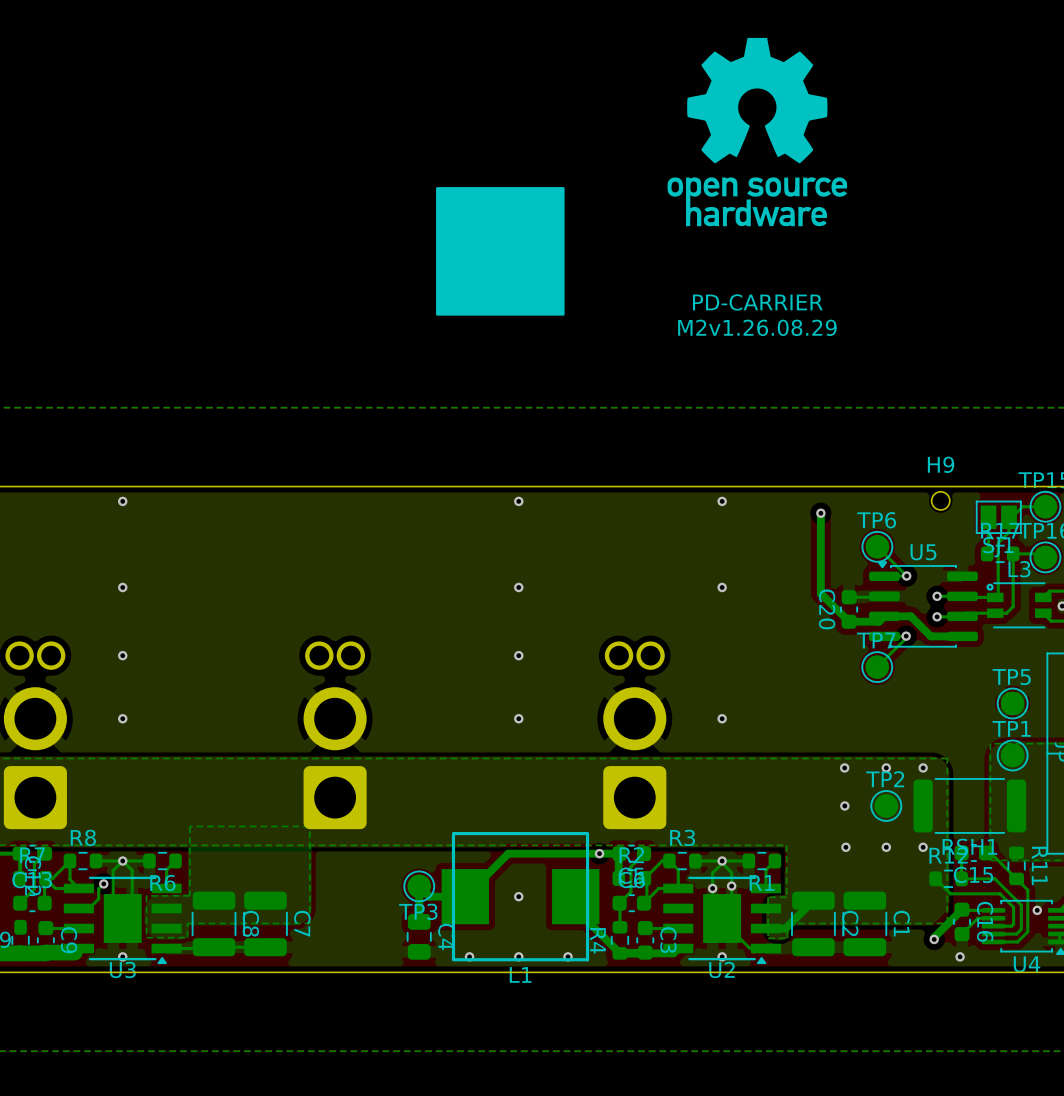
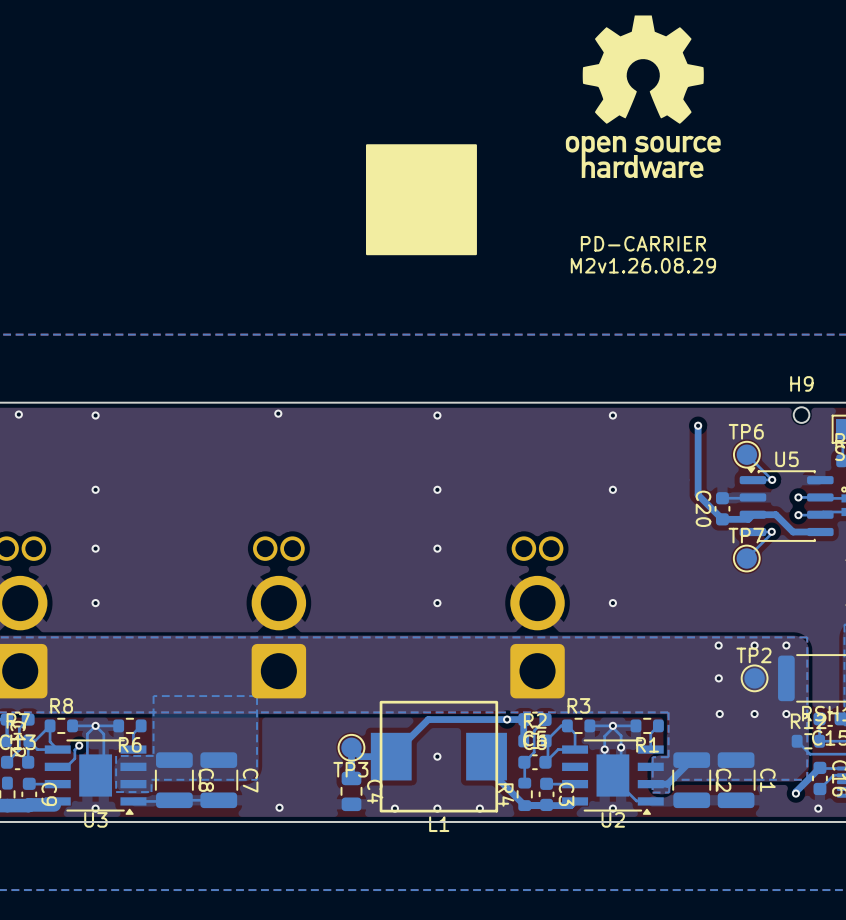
via: none -> (278, 413)
via: none -> (18, 414)
via: none -> (279, 807)

